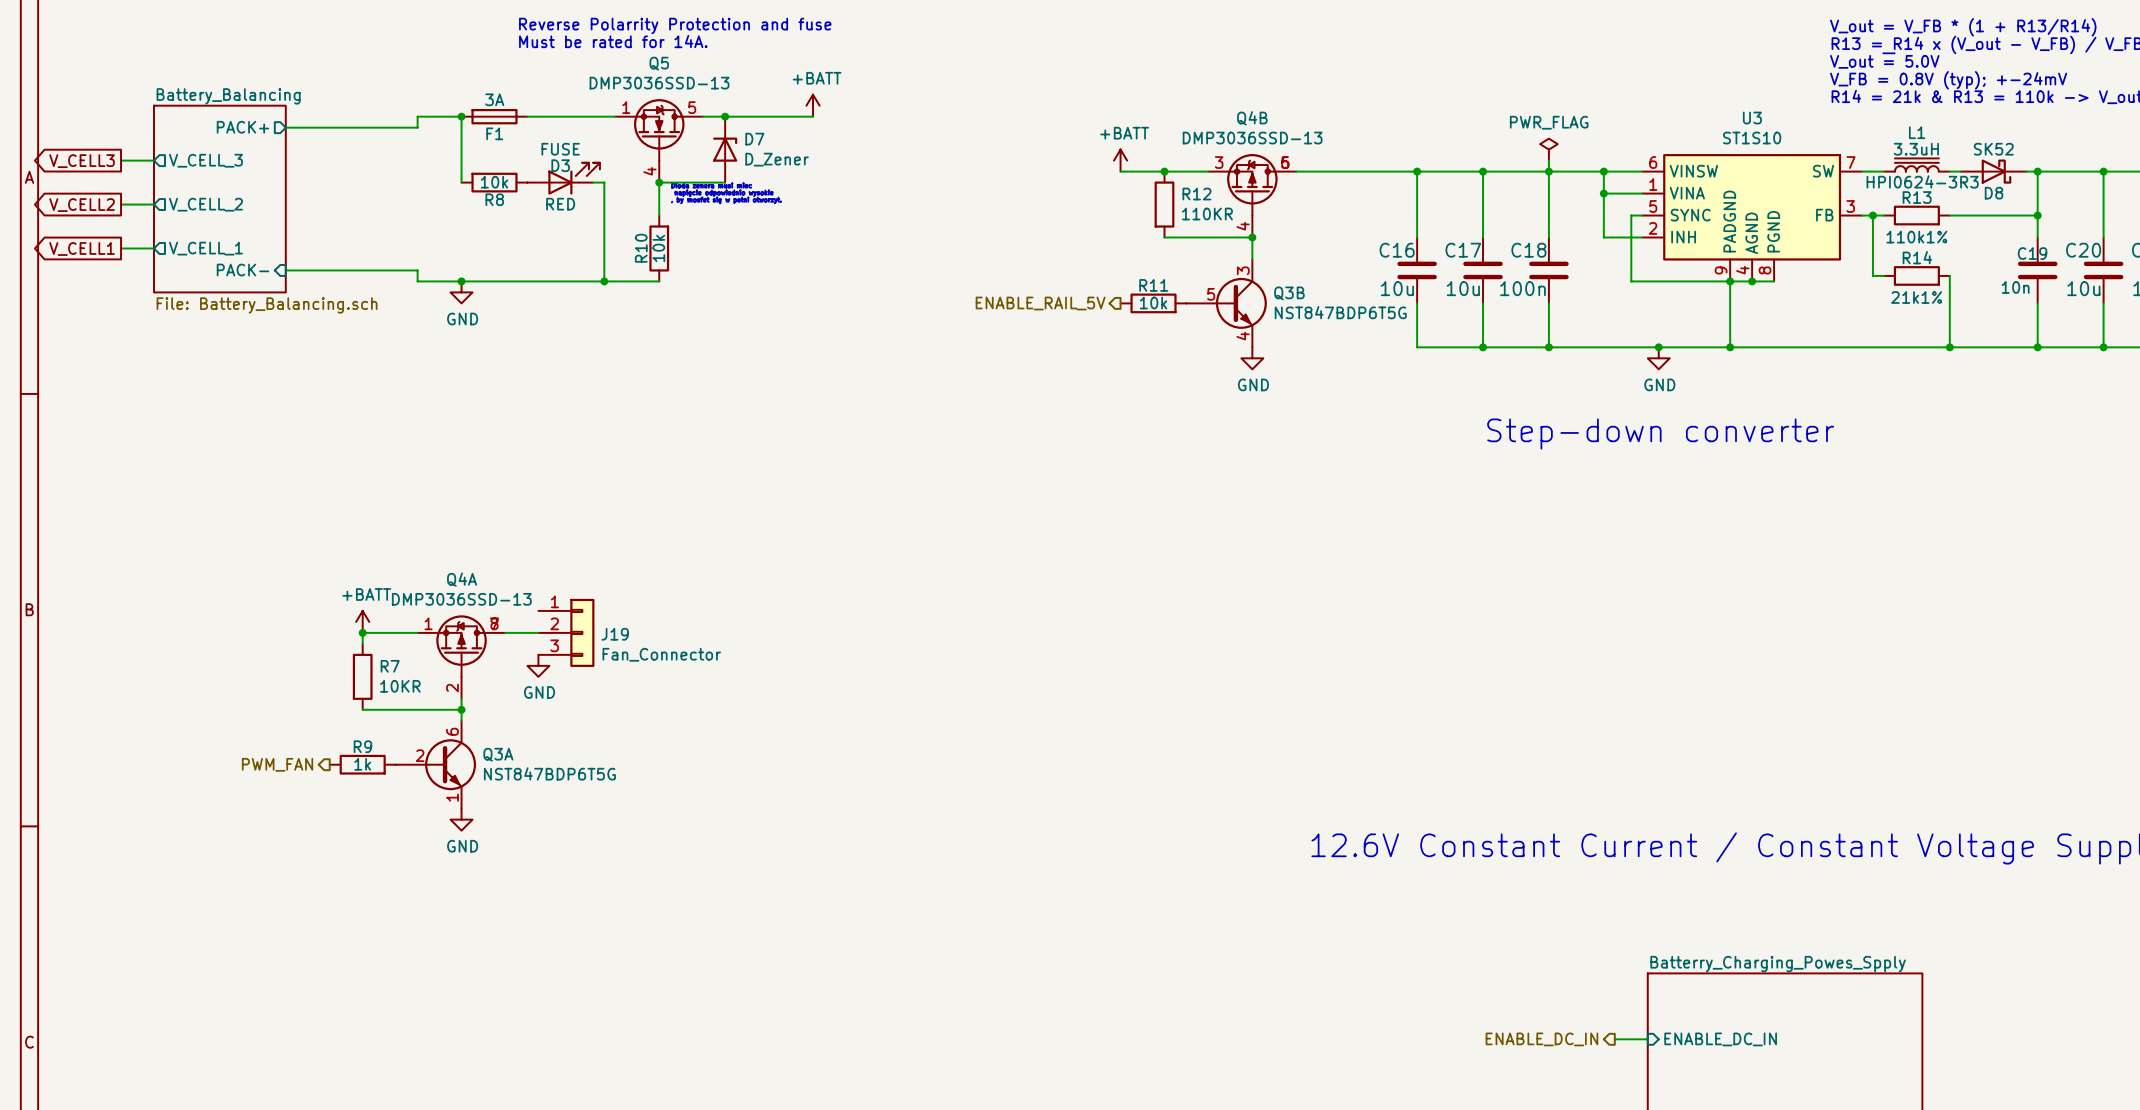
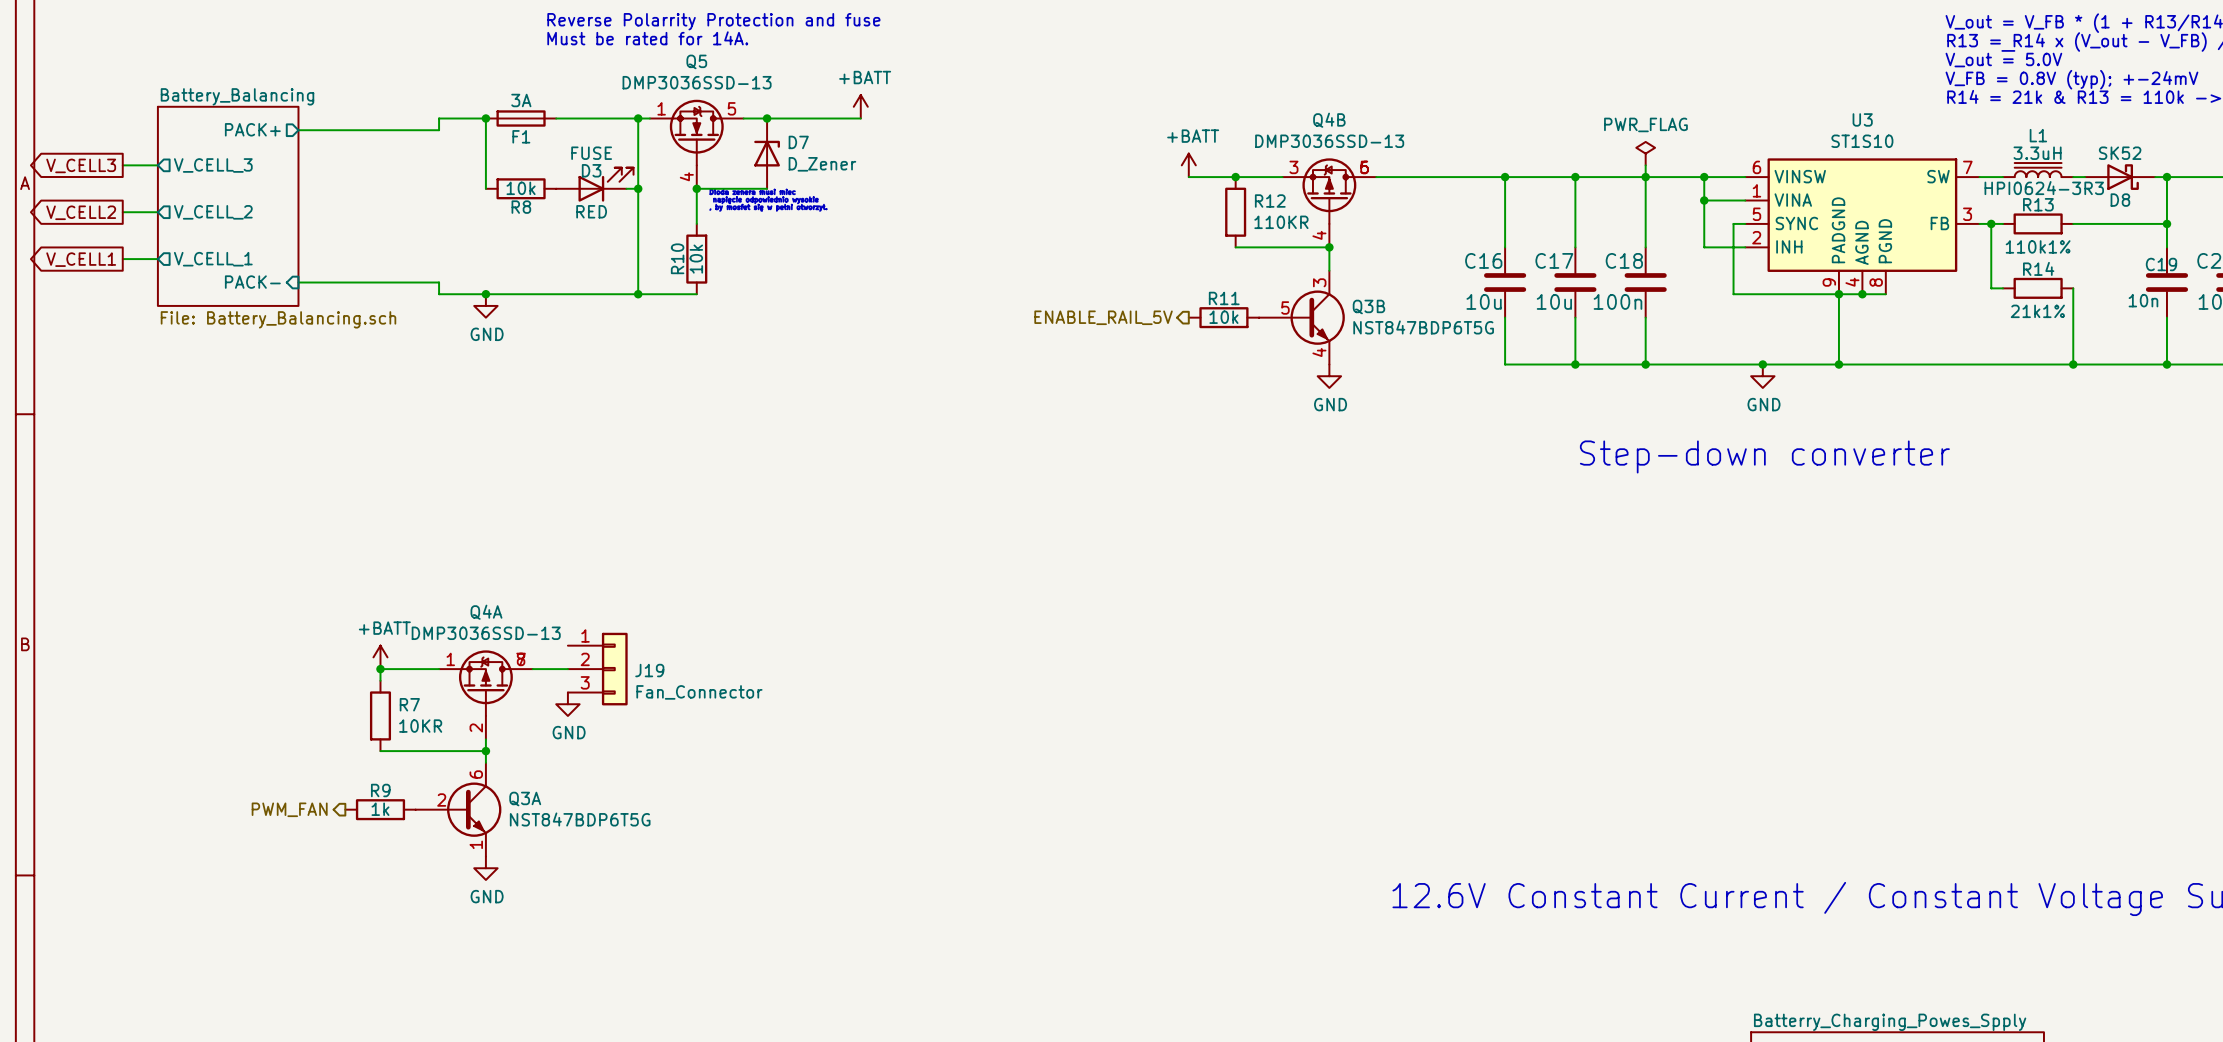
wire: none -> (638, 118) (638, 188)
junction: none -> (638, 118)
junction: none -> (638, 188)

